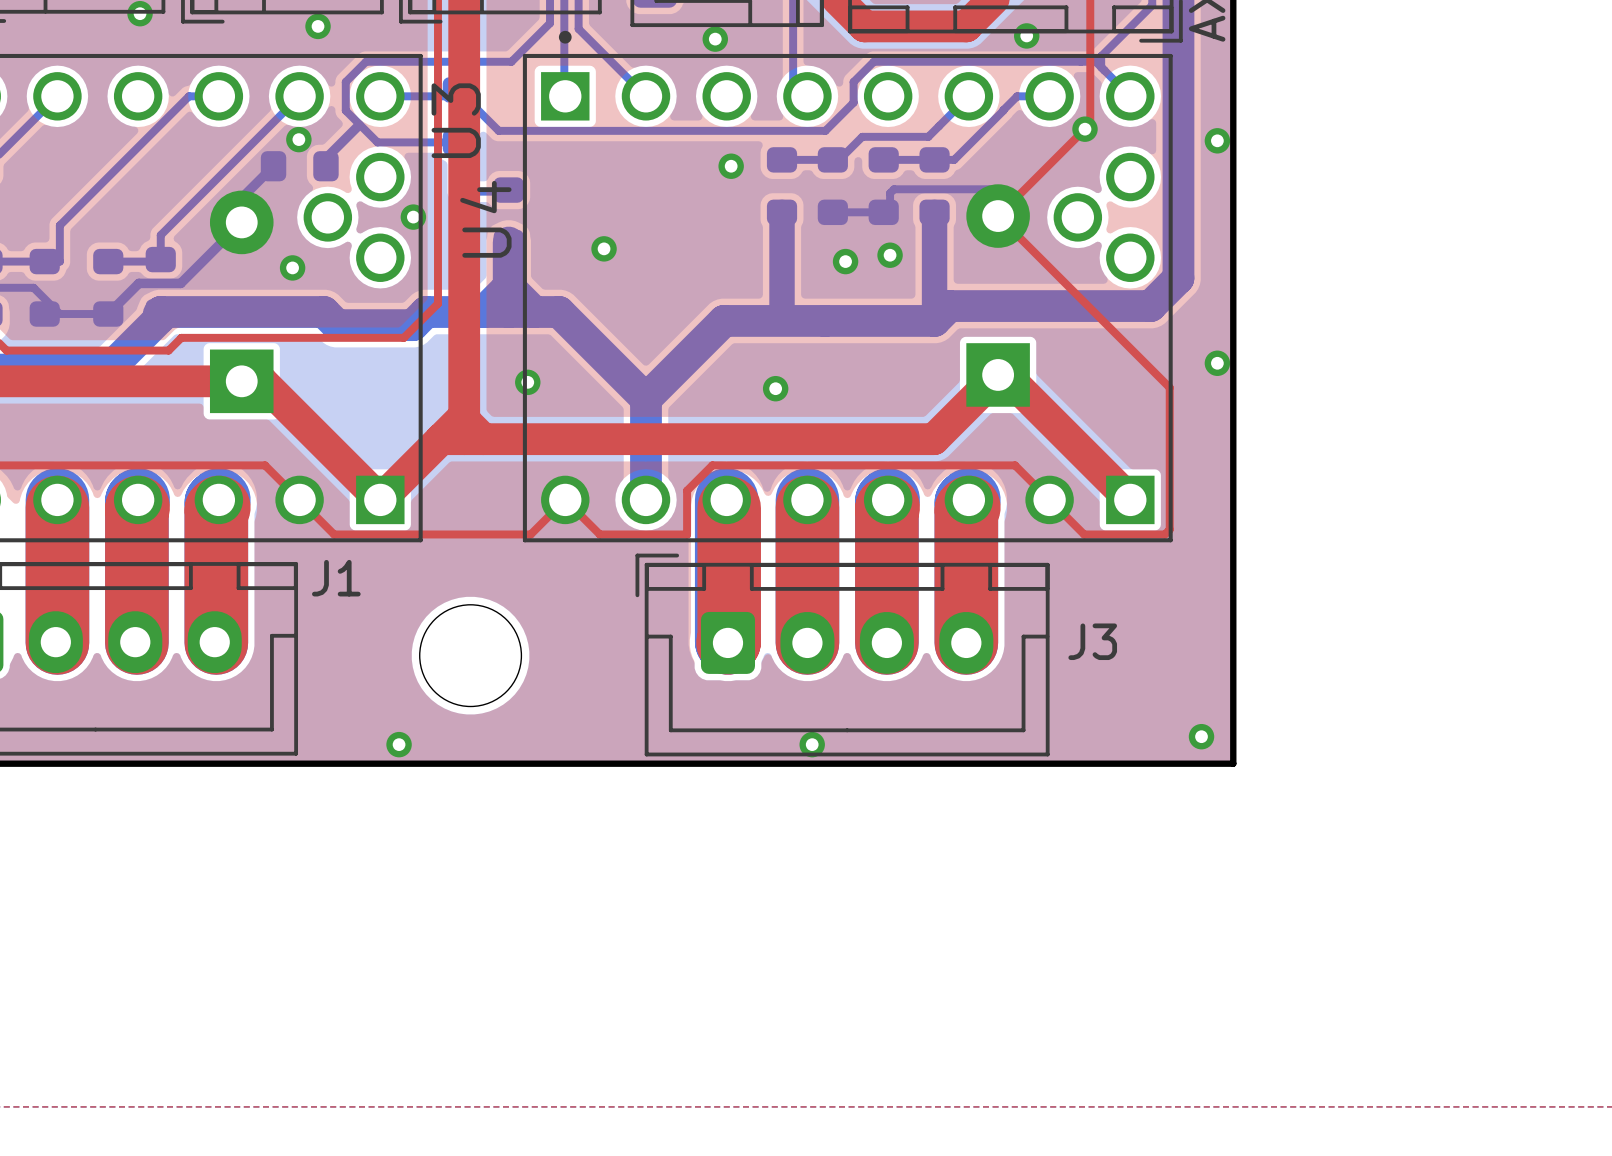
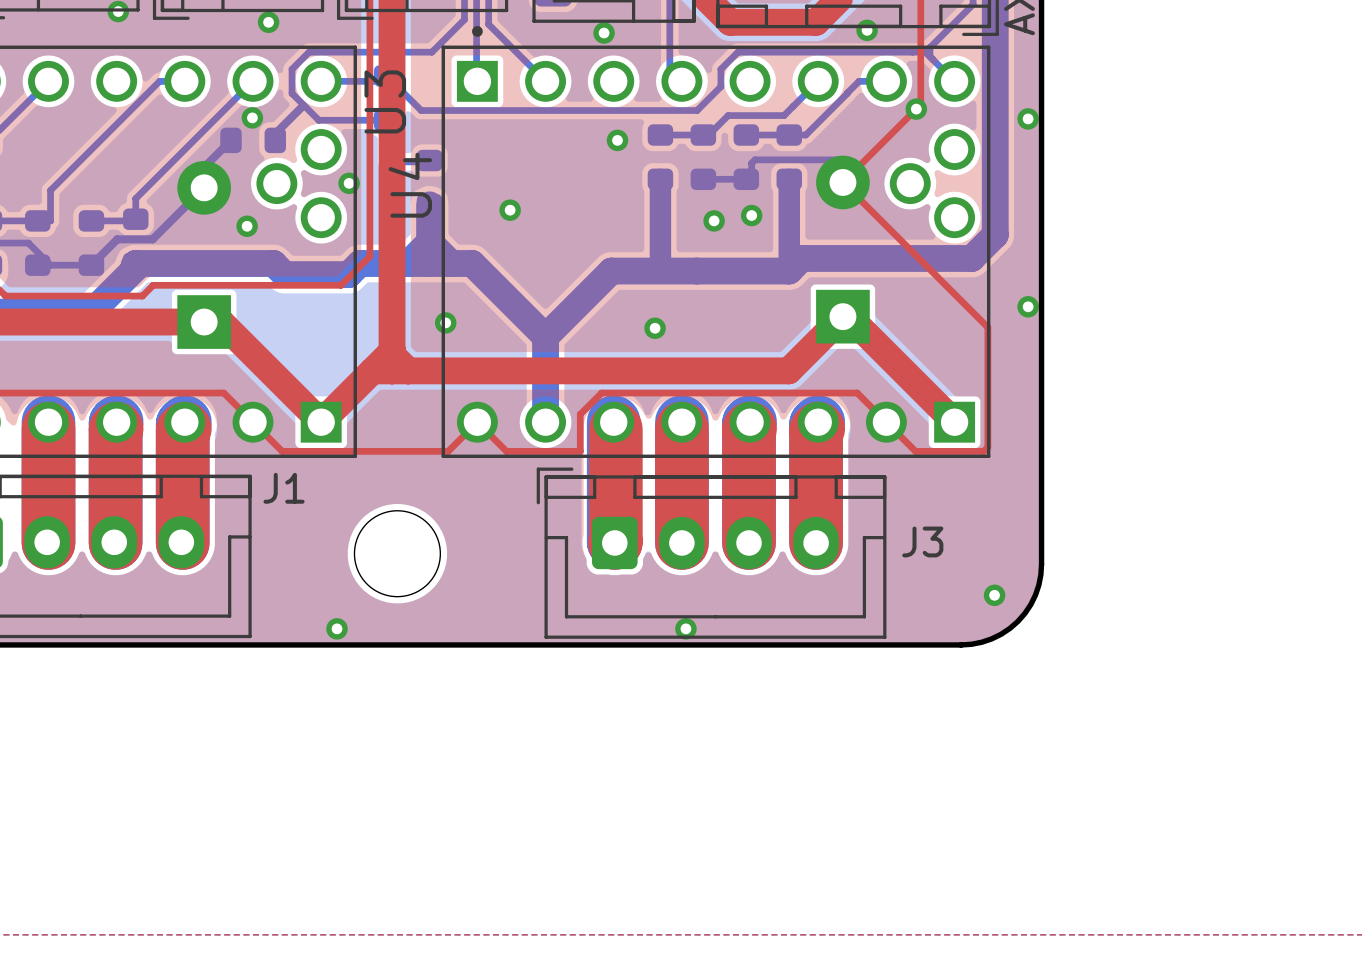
board edge: (1233, 668) (1233, 763) (1137, 763) -> (1041, 564) (1035, 595) (1017, 621) (991, 638) (961, 644)
via position: (1201, 736) -> (994, 595)

